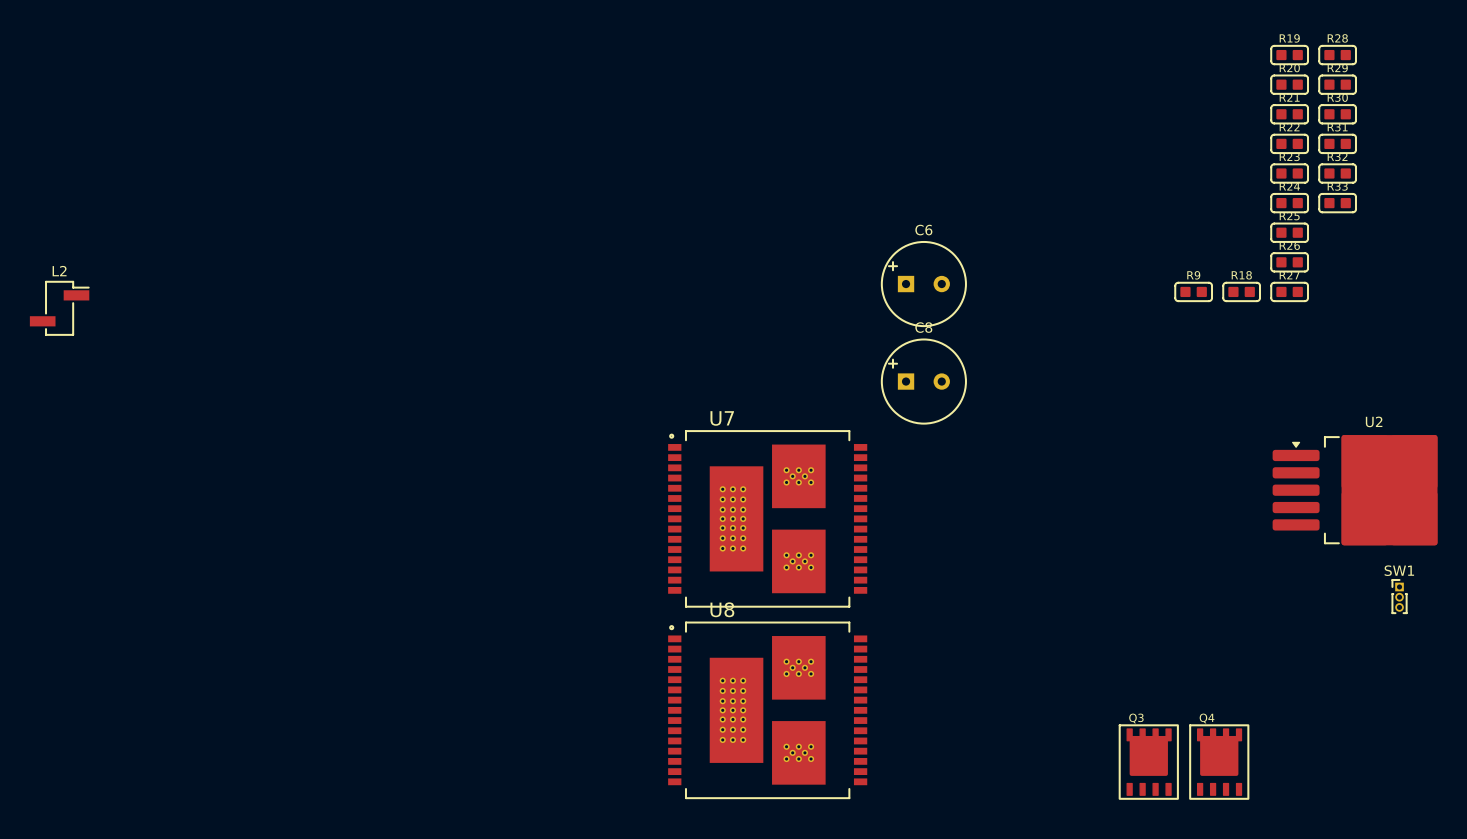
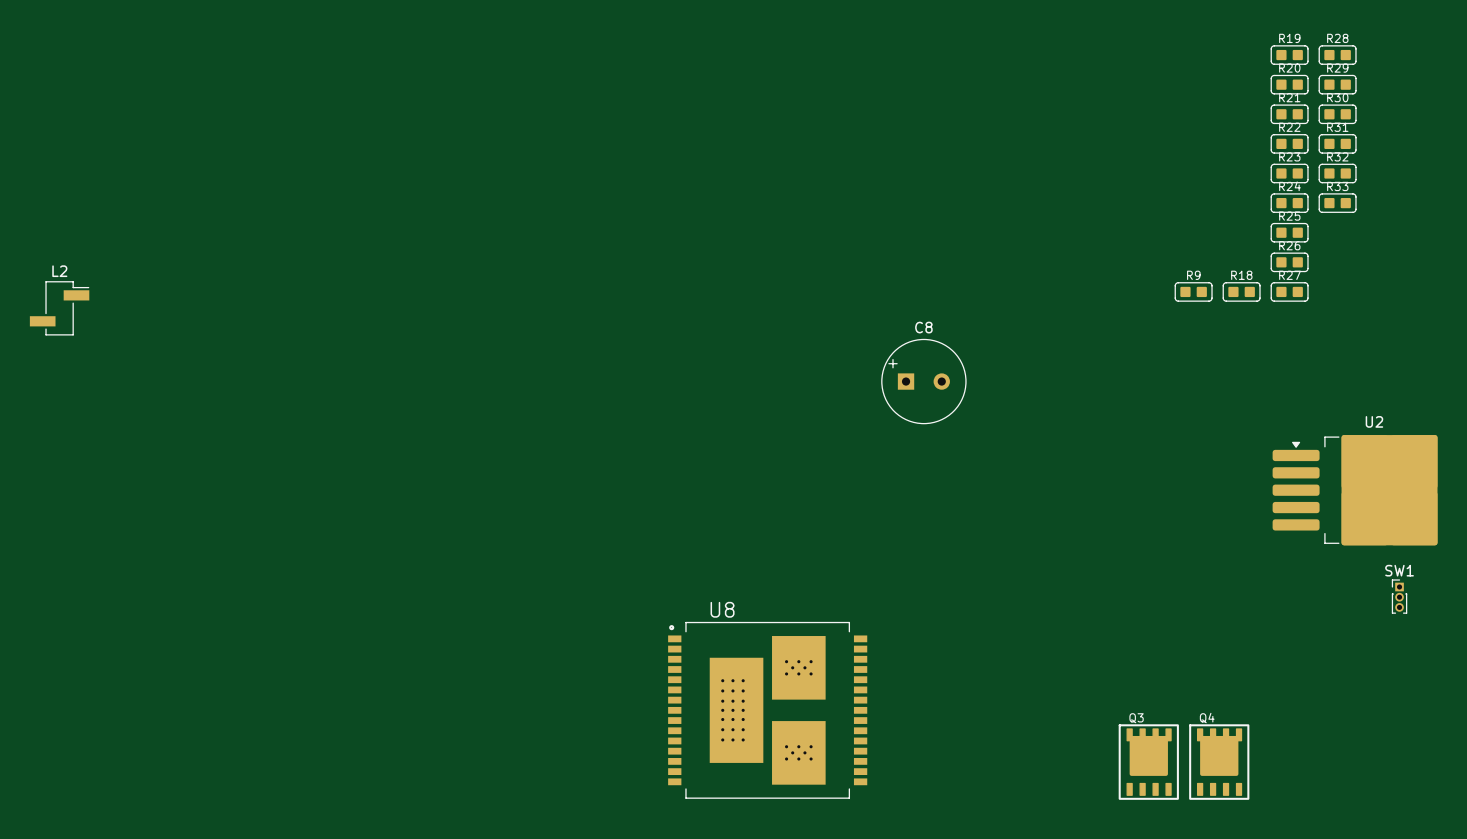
C6: (923, 284) -> none
U7: (767, 518) -> none

